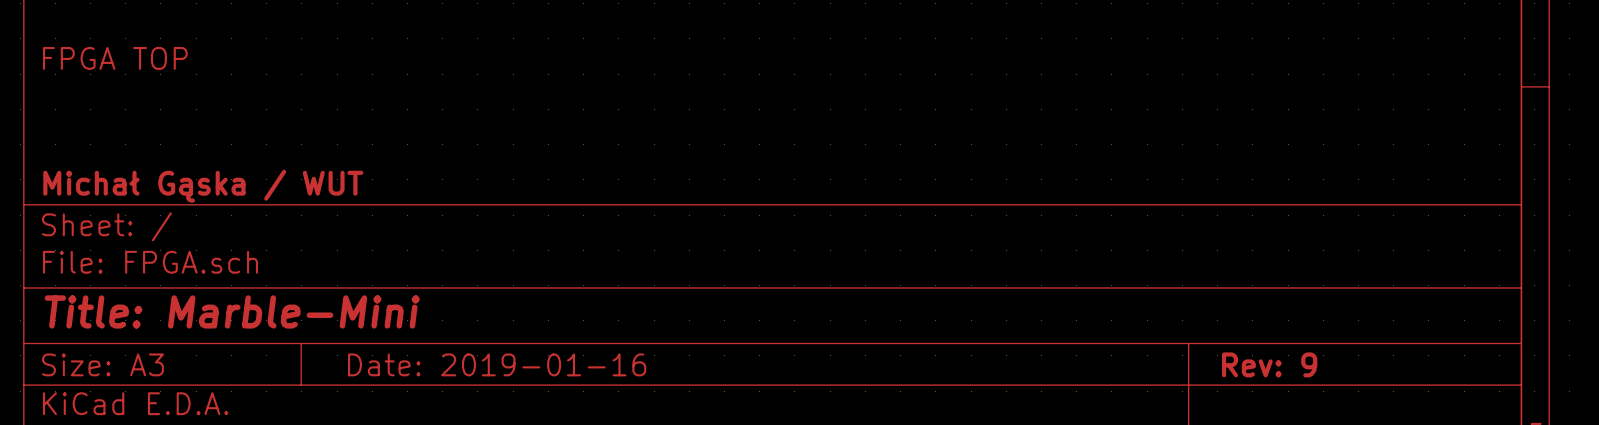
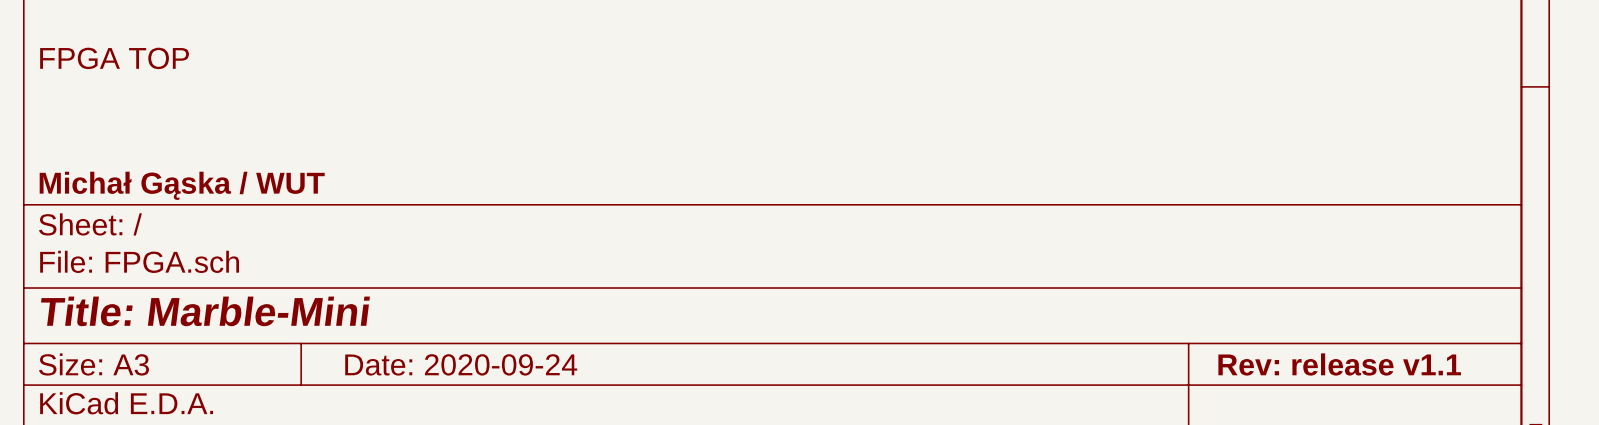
title block: Date: 2019-01-16 (497, 364) -> Date: 2020-09-24 (461, 364)
title block: Rev: 9 (1269, 364) -> Rev: release v1.1 (1339, 364)

